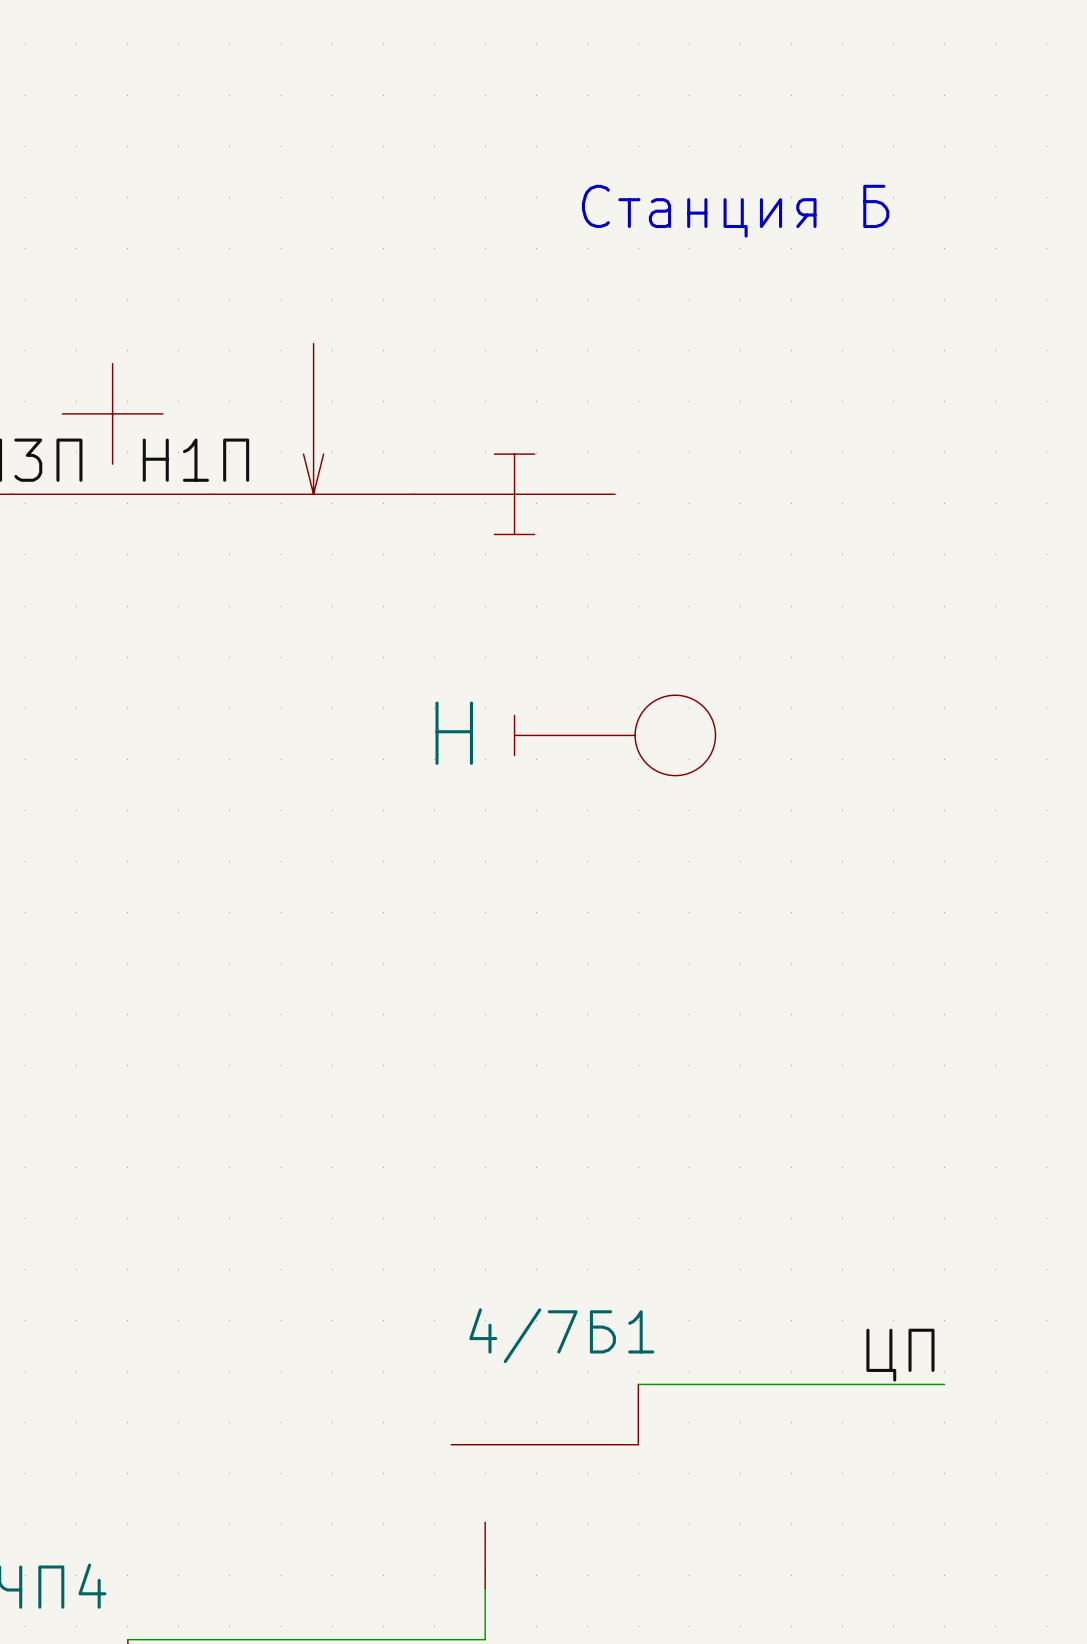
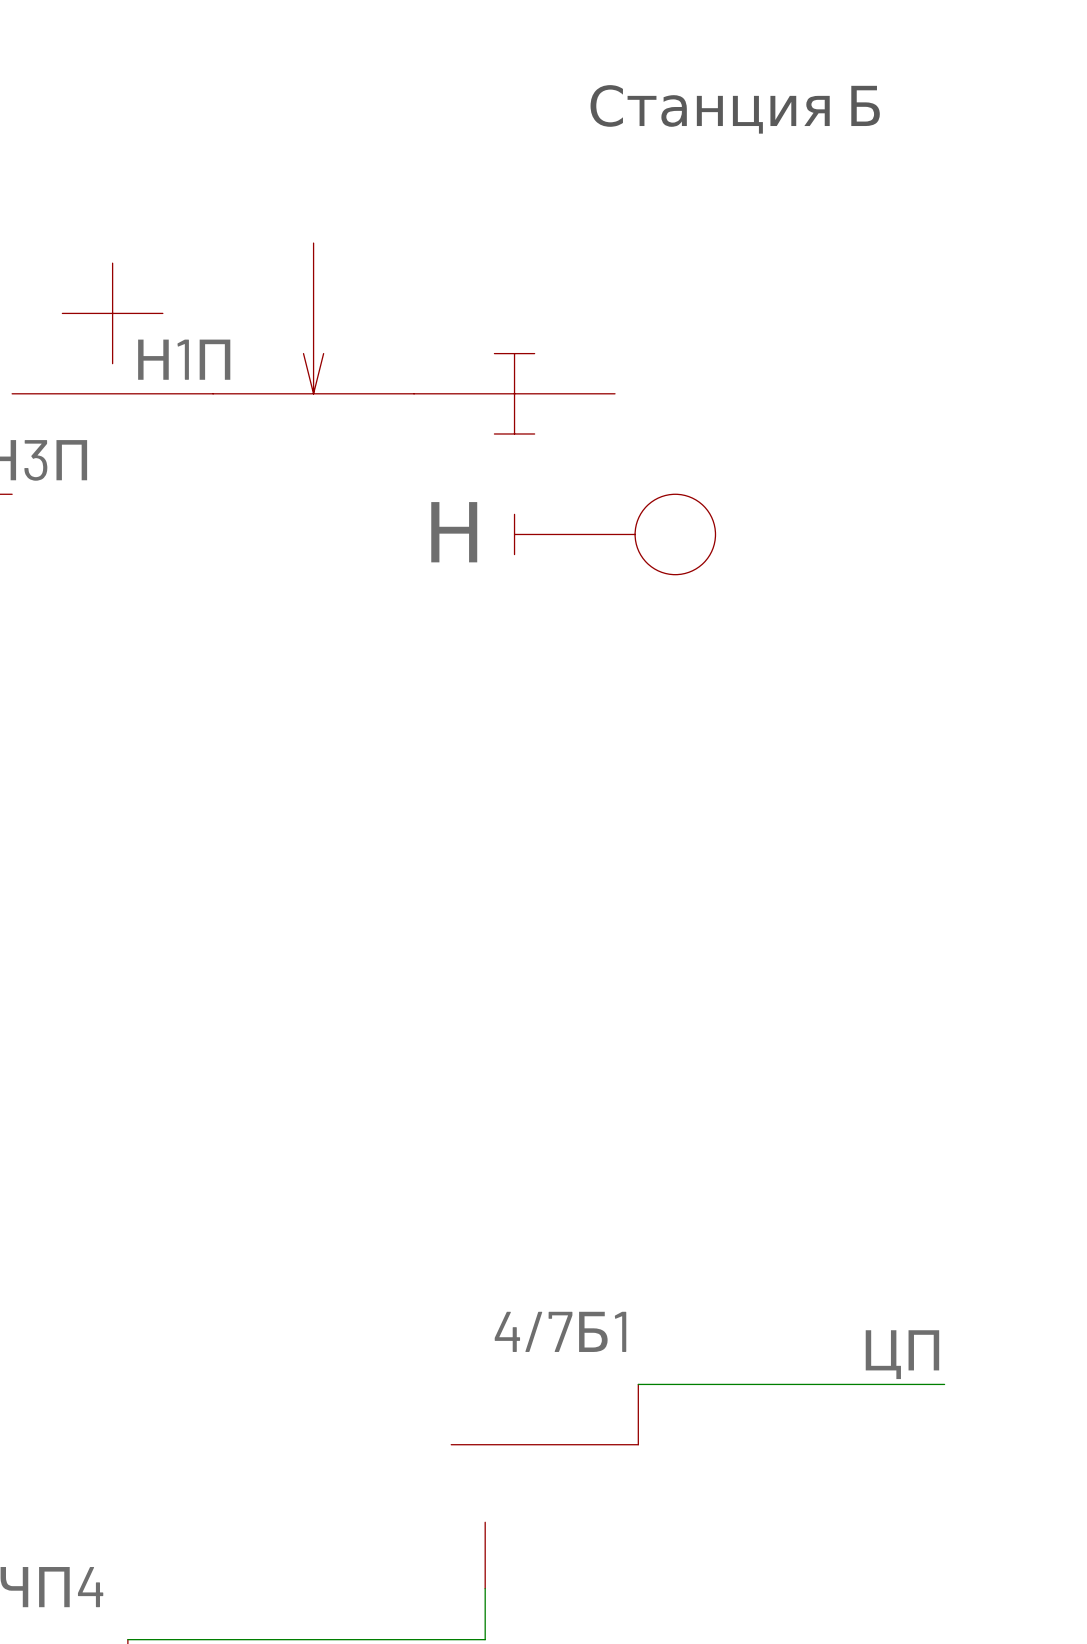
text position: Станция Б (735, 211) -> Станция Б (735, 109)
part position: (313, 418) -> (313, 318)
part position: (112, 428) -> (112, 328)
label position: Н1П (195, 460) -> Н1П (184, 359)
part position: (514, 494) -> (514, 393)
part position: (615, 735) -> (615, 534)

